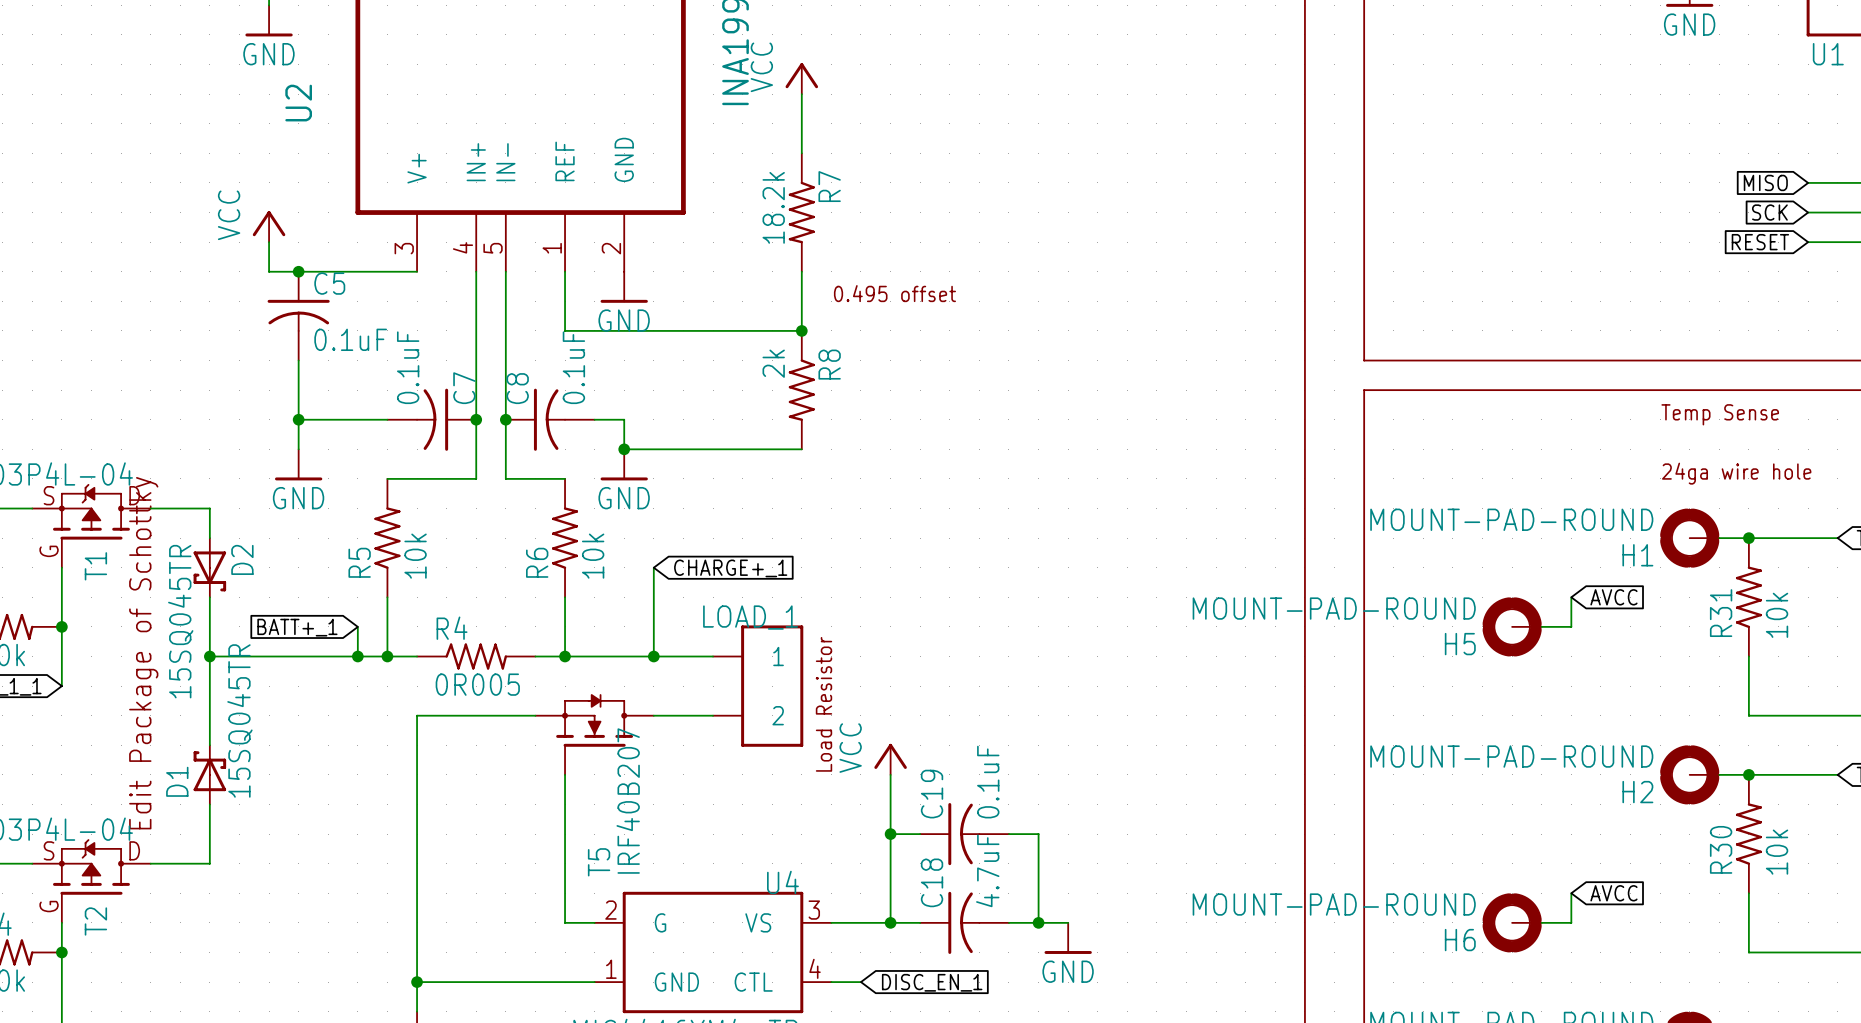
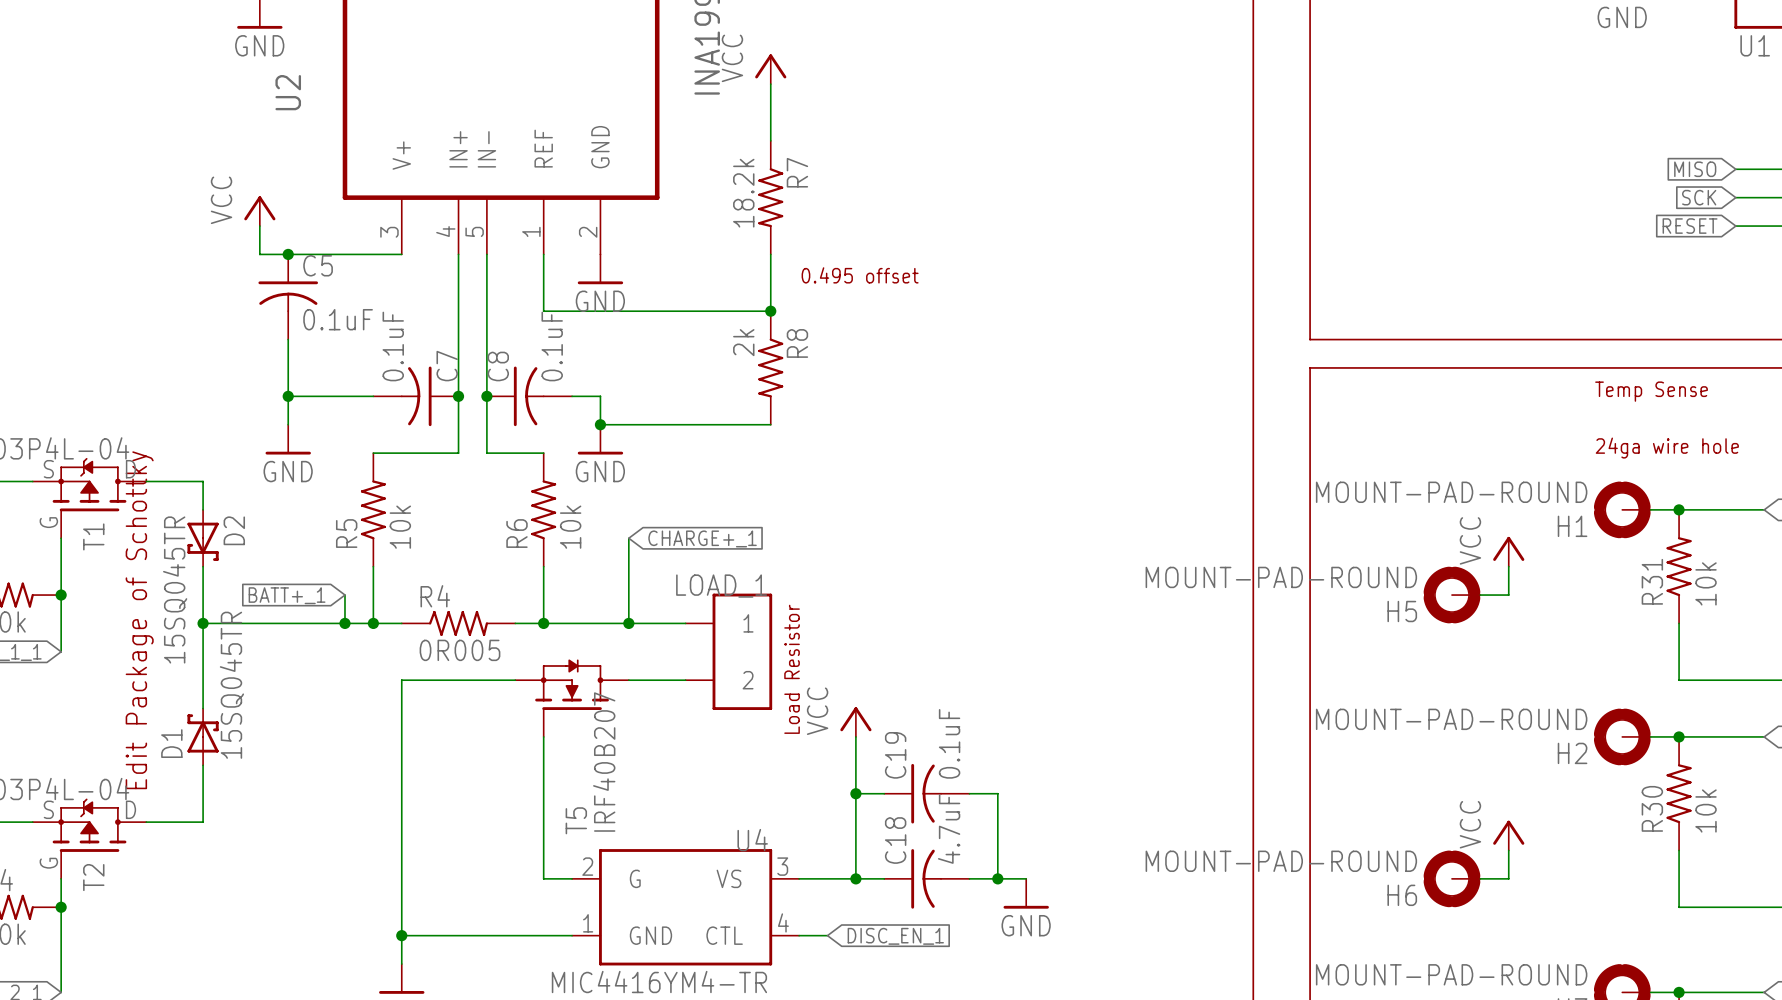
power symbol: none -> VCC (1508, 551)
global label: AVCC (1613, 597) -> none
power symbol: none -> VCC (1508, 835)
global label: AVCC (1613, 893) -> none

